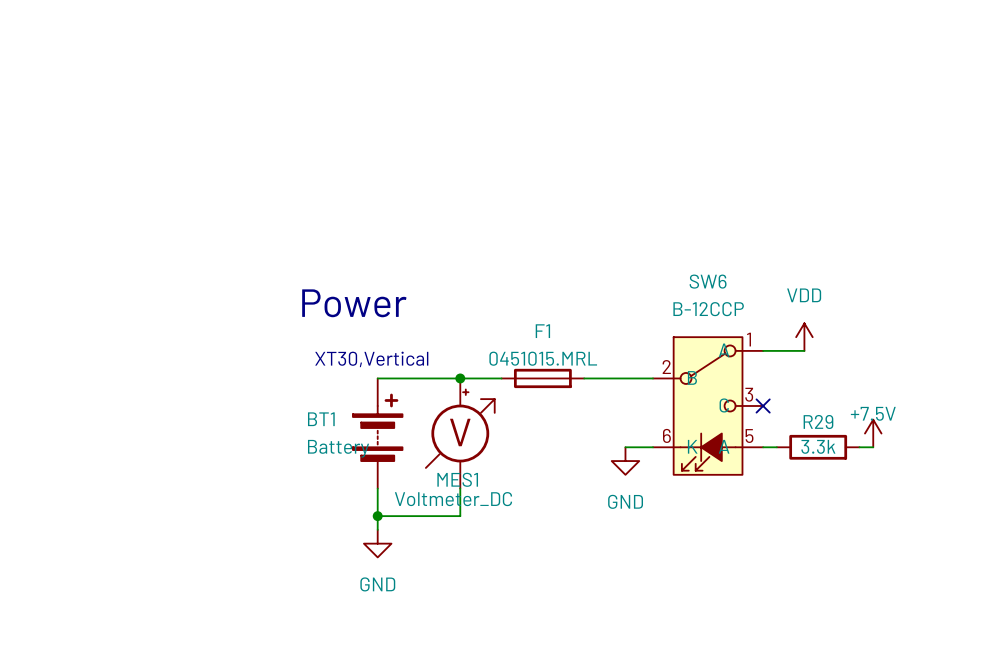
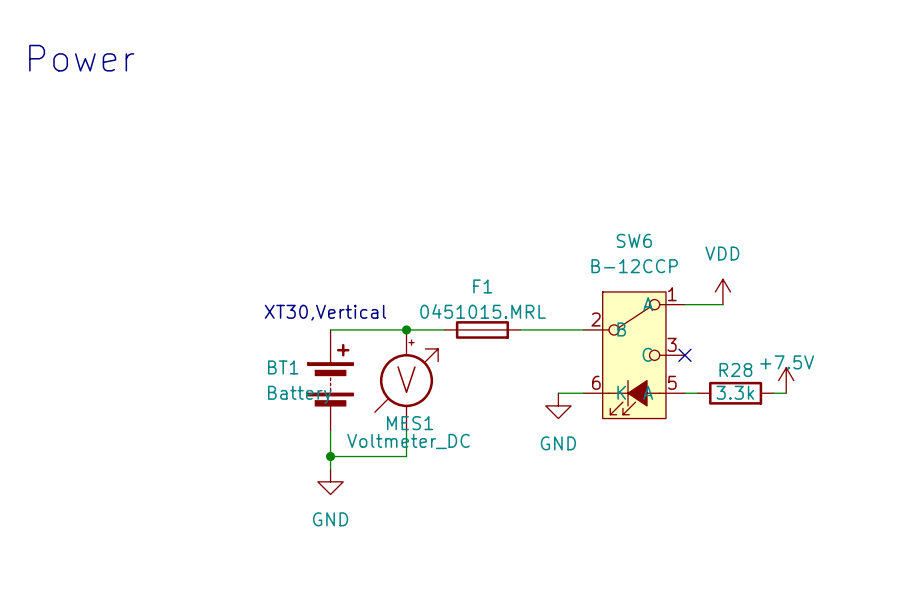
text: none -> Power (81, 58)
text: Power (354, 303) -> none
R29 name: R29 (818, 422) -> R28 (735, 369)

